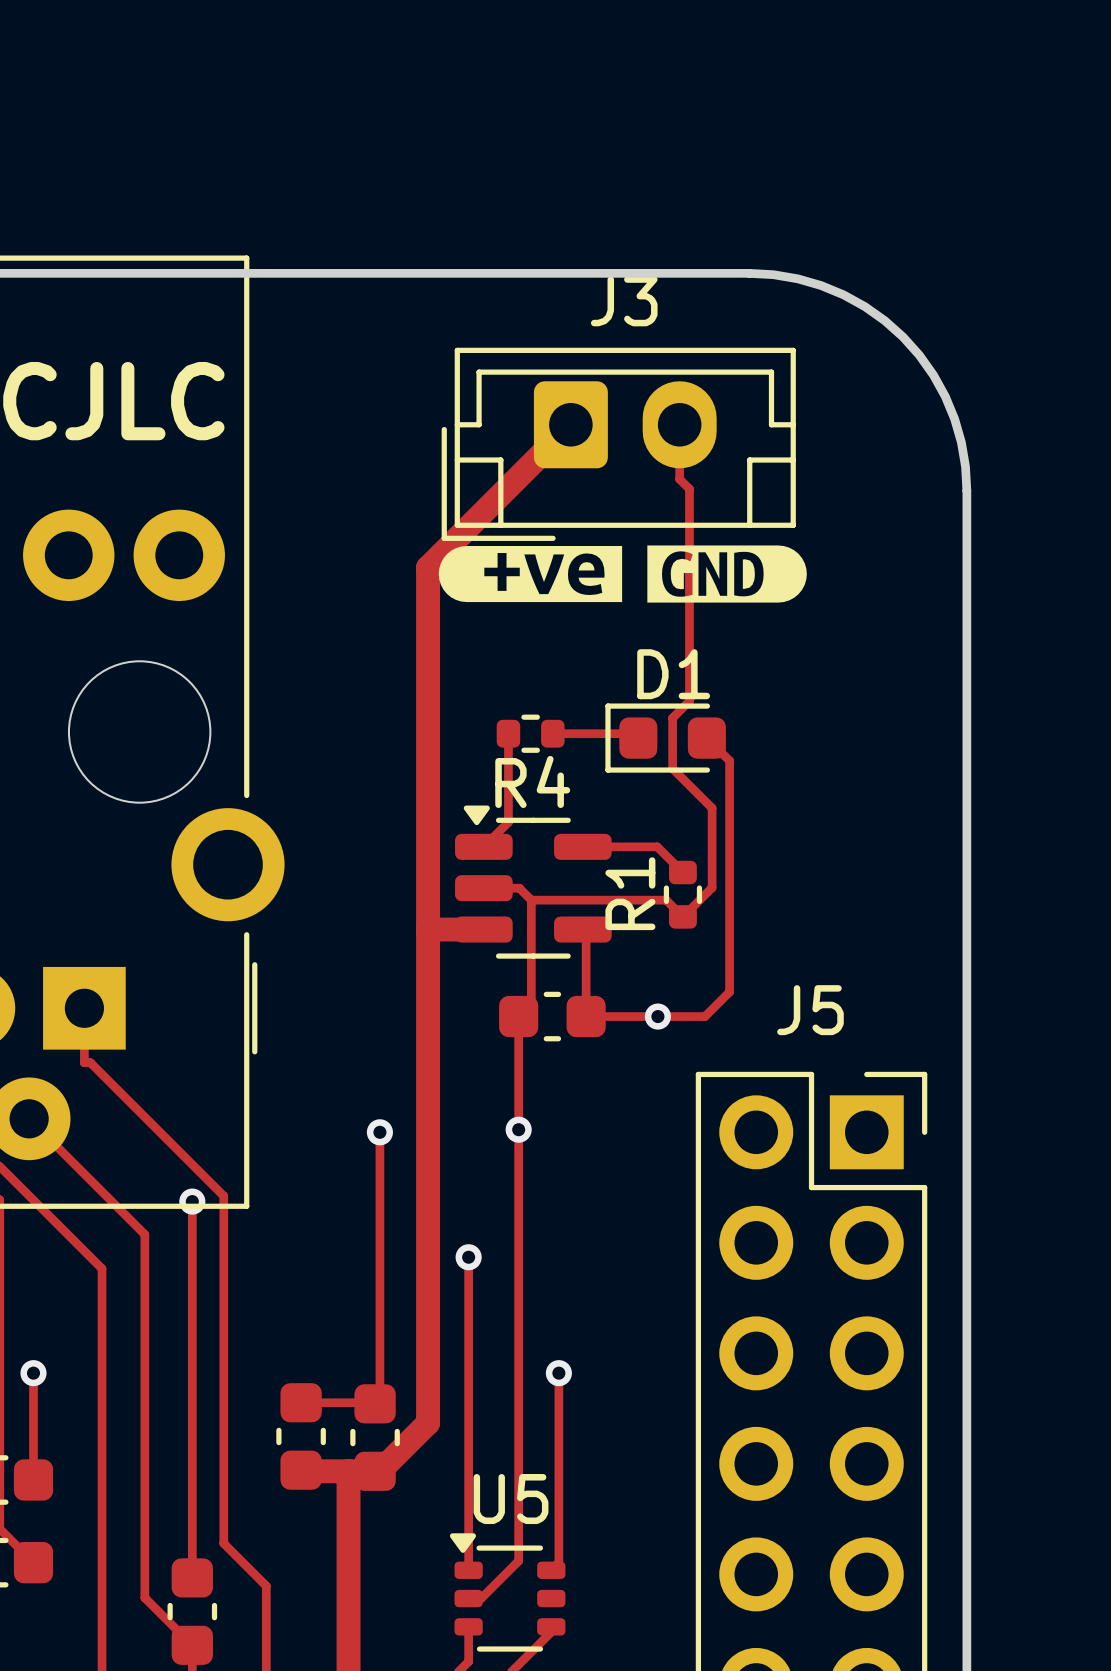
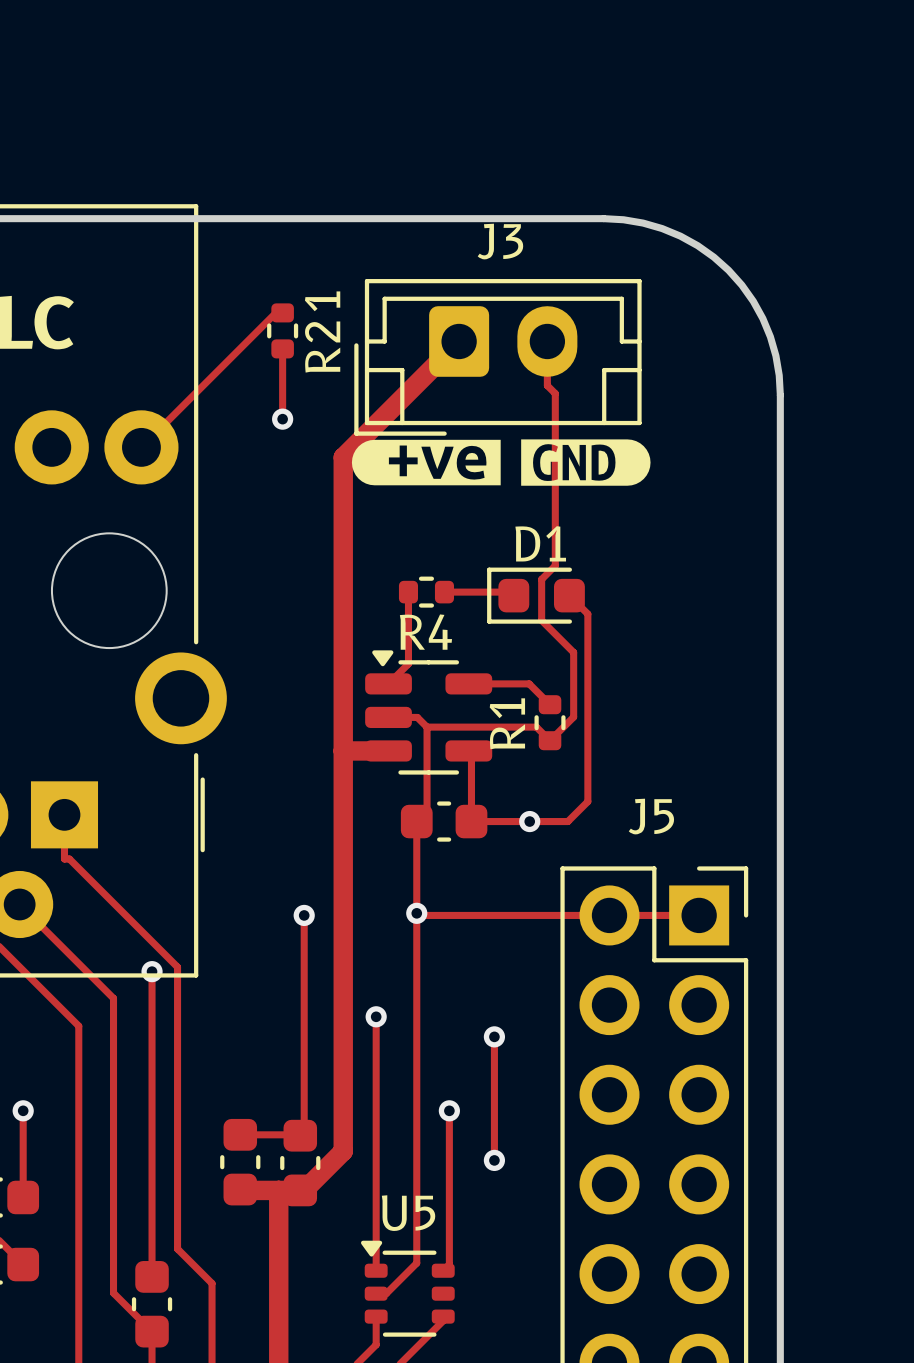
track: none -> (282, 312) (275, 312) (141, 447)
R21: none -> (282, 330)
track: none -> (282, 348) (282, 419)
via: none -> (282, 419)
track: none -> (416, 913) (418, 915) (699, 915)
track: none -> (494, 1036) (494, 1160)
via: none -> (494, 1036)
via: none -> (494, 1160)

